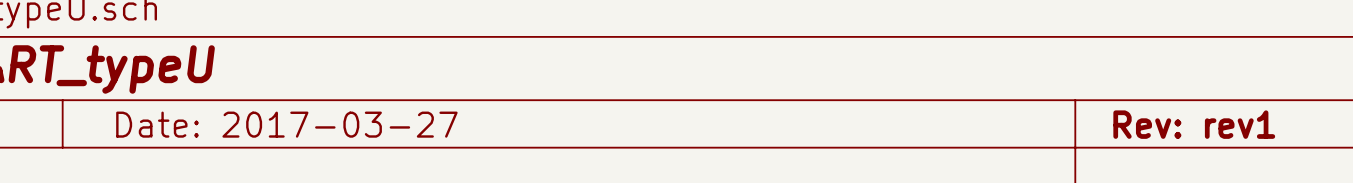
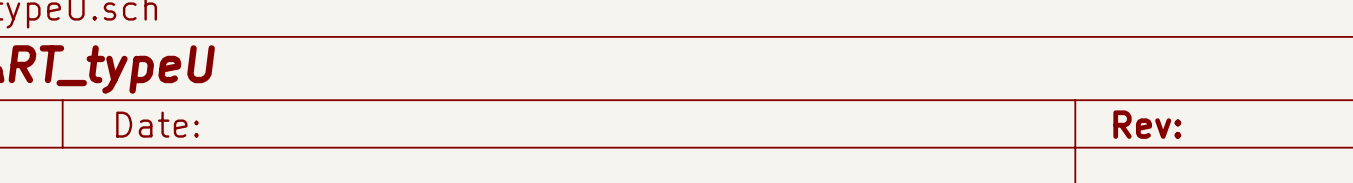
title block: Date: 2017-03-27 (286, 124) -> Date: (157, 124)
title block: Rev: rev1 (1194, 124) -> Rev: (1147, 124)

